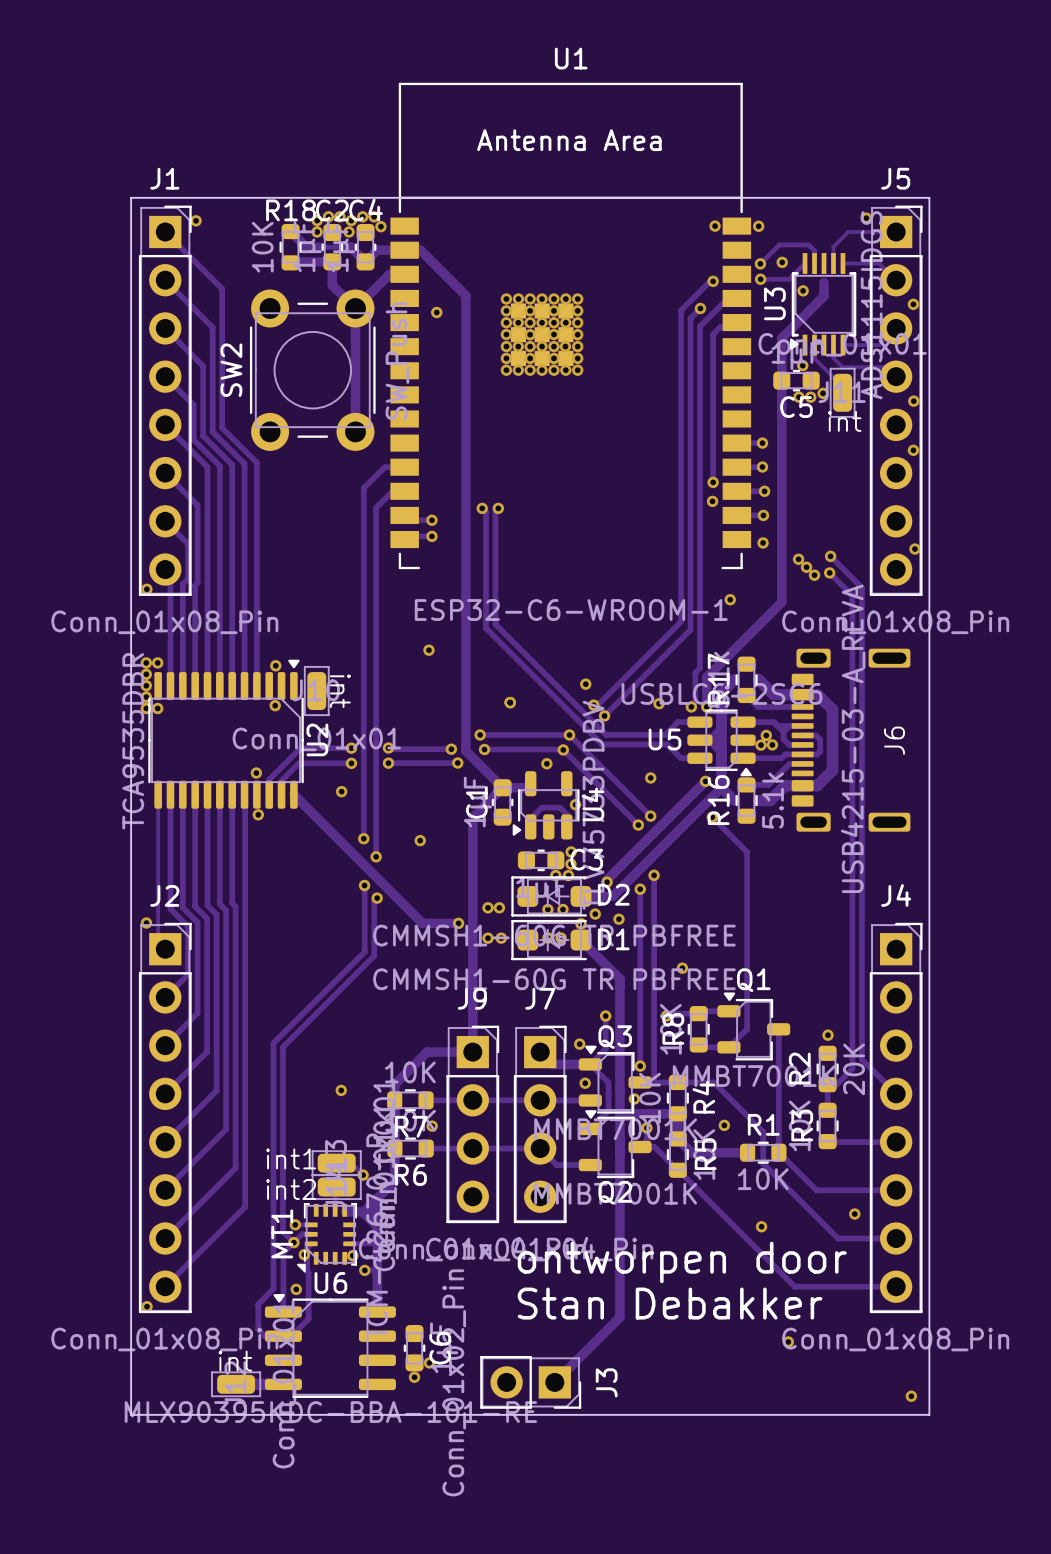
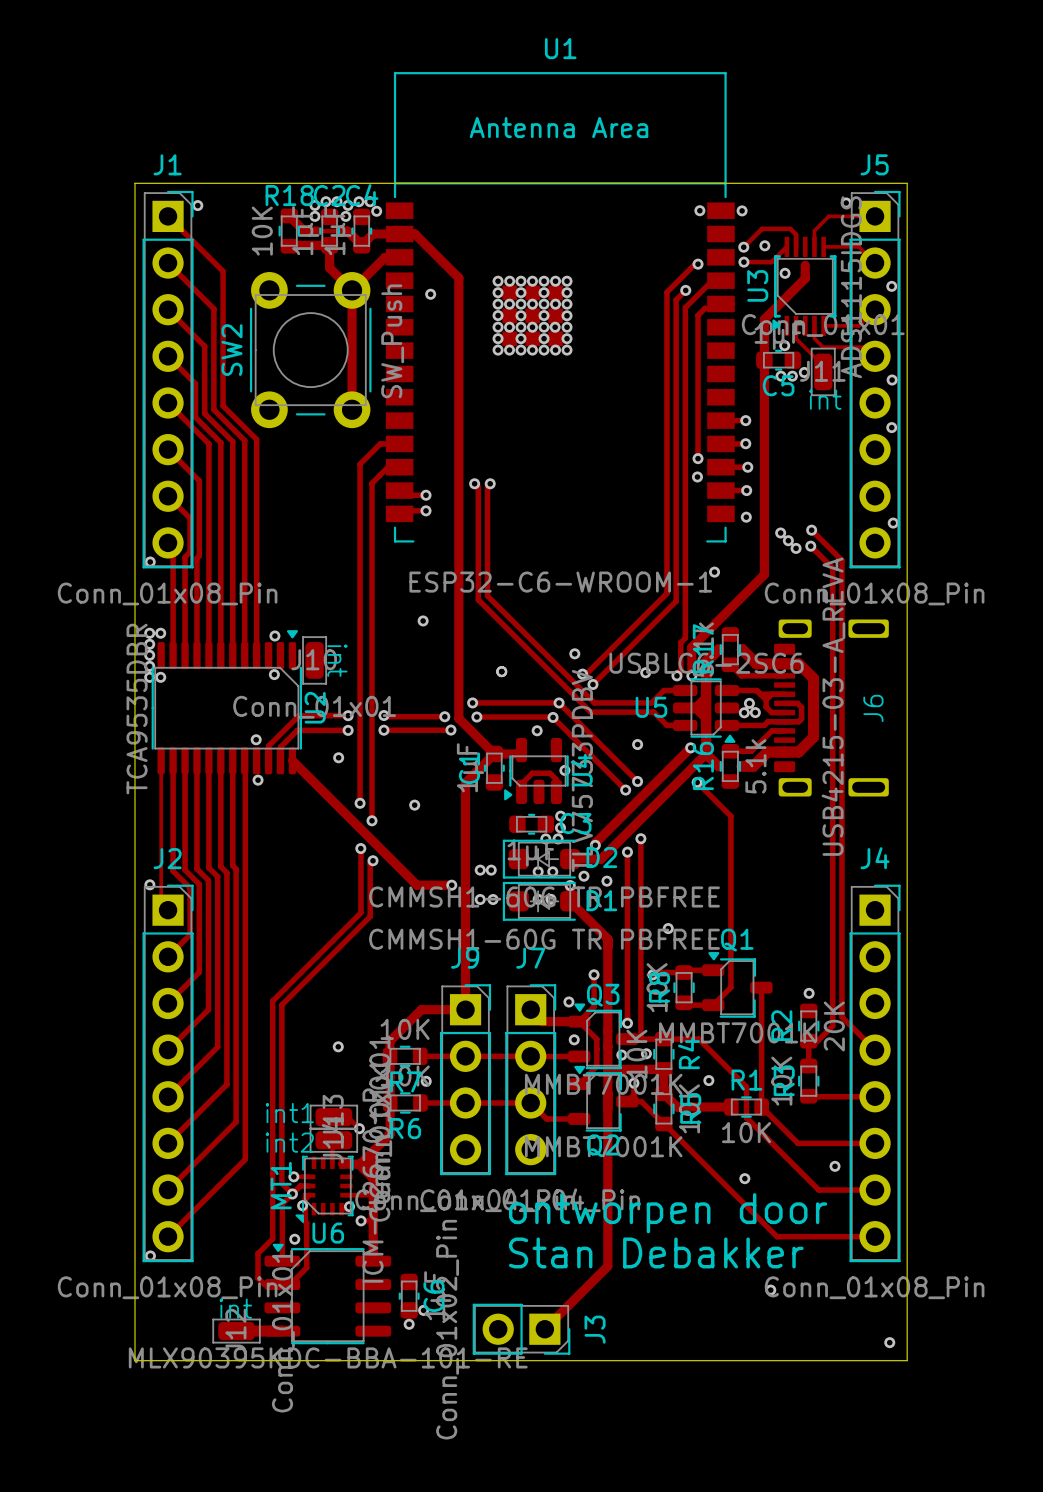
via: none -> (646, 1053)

